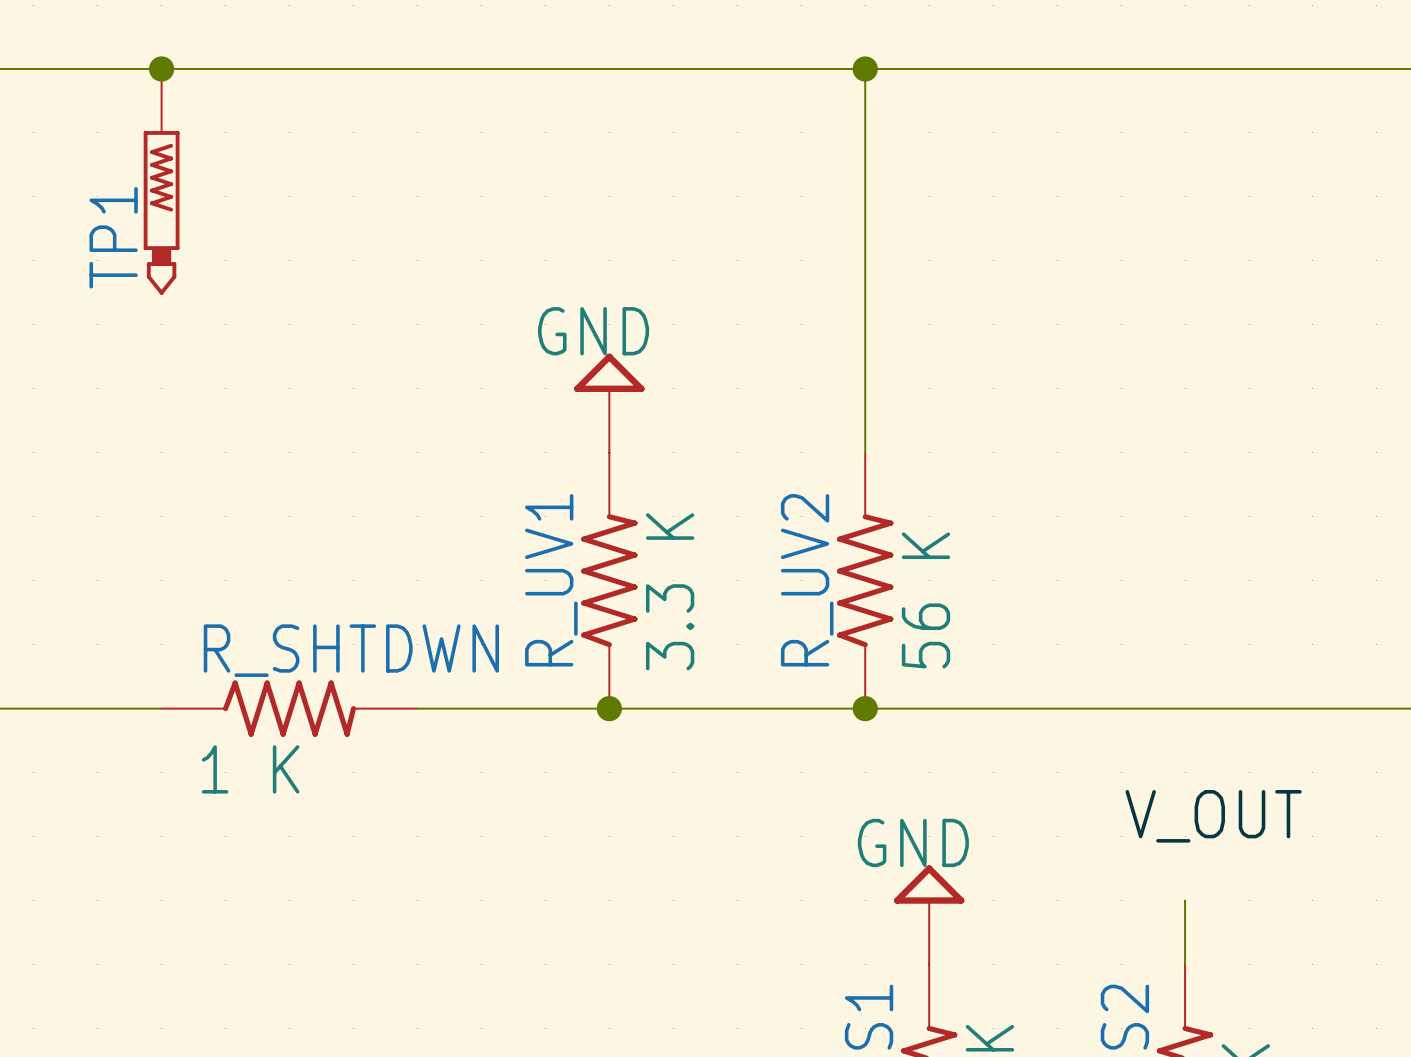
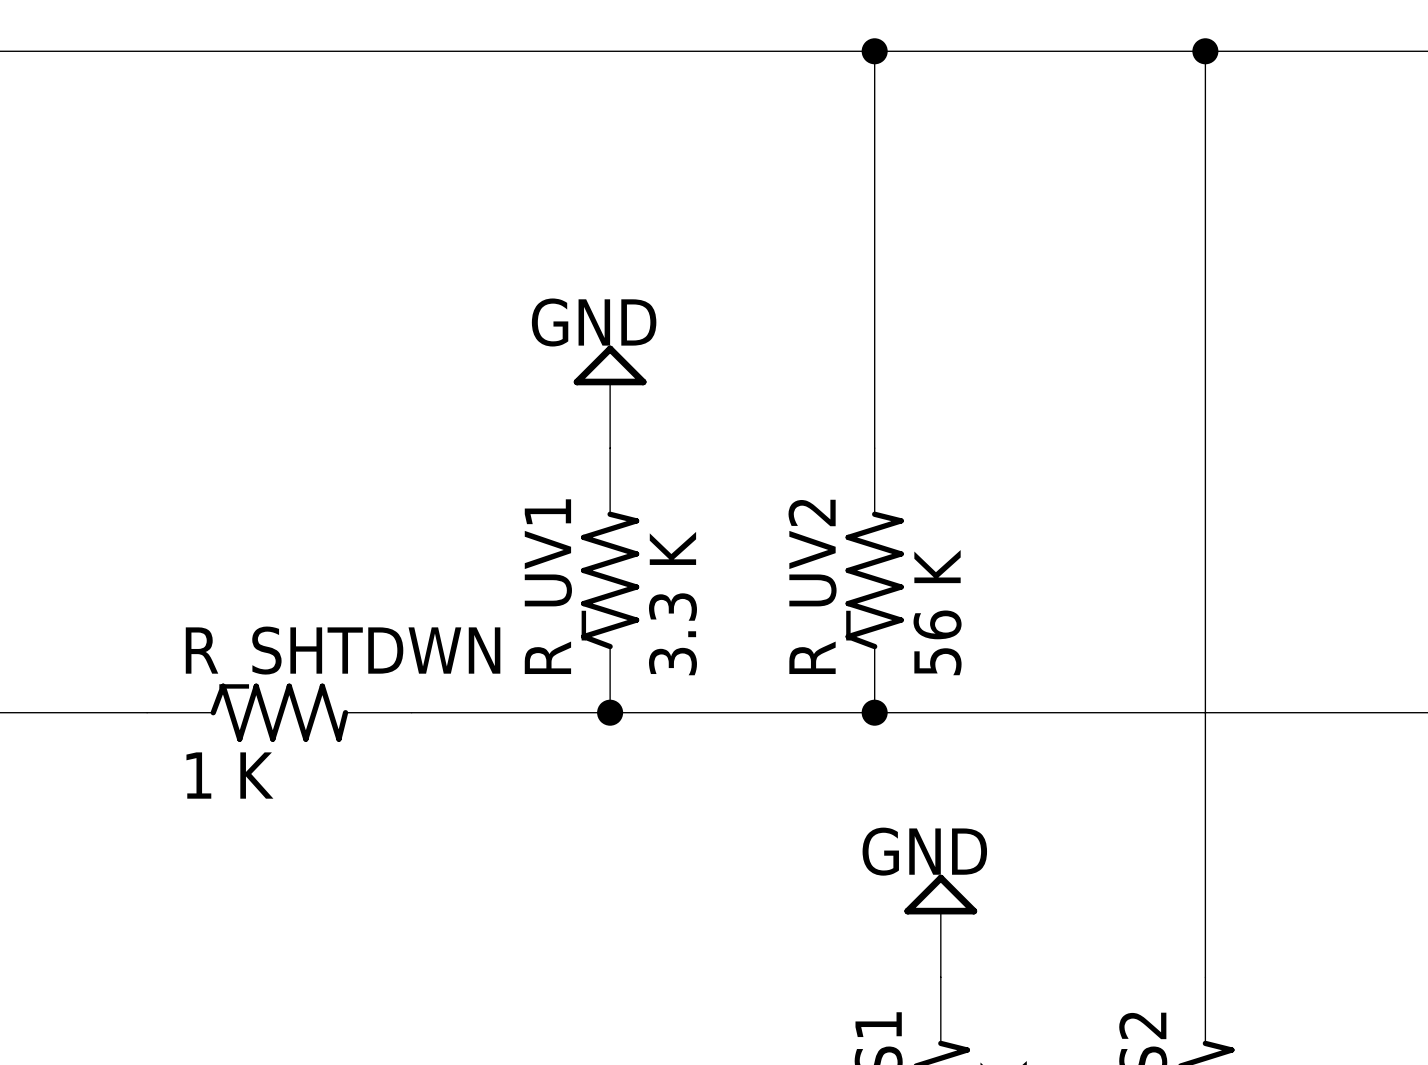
junction: (161, 68) -> none
wire: none -> (1205, 51) (1205, 911)
junction: none -> (1205, 51)
TP1: (161, 181) -> none
label: V_OUT (1213, 816) -> none

